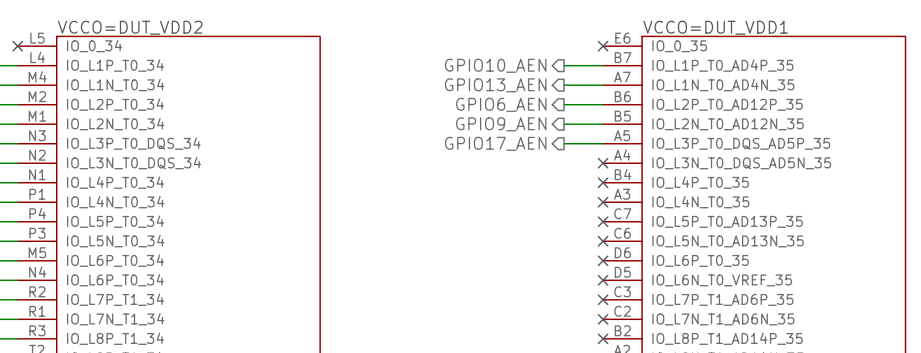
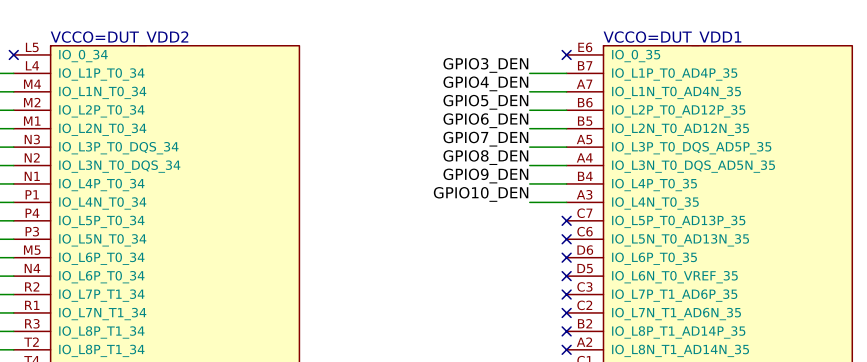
label: none -> GPIO3_DEN (485, 65)
hierarchical label: GPIO10_AEN (495, 65) -> none
label: none -> GPIO4_DEN (485, 83)
hierarchical label: GPIO13_AEN (495, 85) -> none
label: none -> GPIO5_DEN (485, 102)
hierarchical label: GPIO6_AEN (501, 104) -> none
label: none -> GPIO6_DEN (485, 120)
hierarchical label: GPIO9_AEN (501, 124) -> none
label: none -> GPIO7_DEN (485, 139)
hierarchical label: GPIO17_AEN (495, 143) -> none
label: none -> GPIO8_DEN (485, 157)
wire: none -> (529, 165) (566, 165)
no-connect mark: (603, 163) -> none
label: none -> GPIO9_DEN (485, 176)
wire: none -> (529, 183) (566, 183)
no-connect mark: (603, 182) -> none
label: none -> GPIO10_DEN (481, 194)
wire: none -> (529, 202) (566, 202)
no-connect mark: (603, 202) -> none

